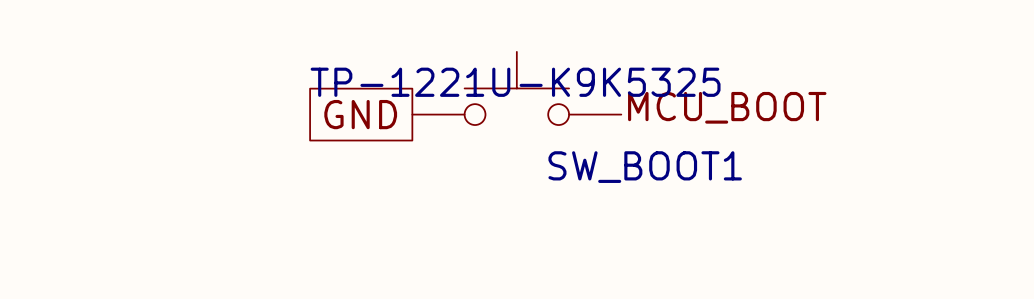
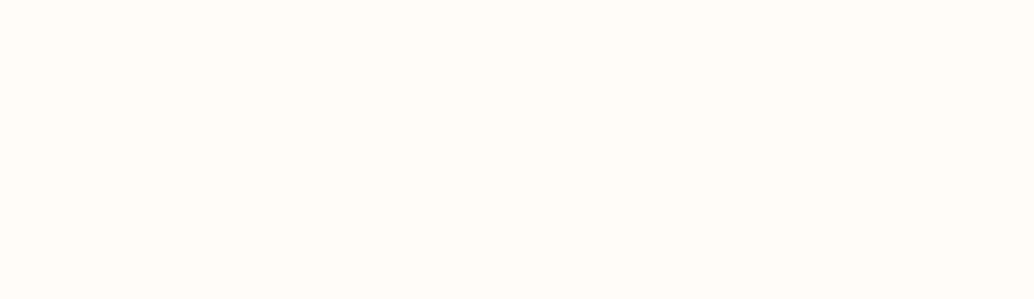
SW_BOOT1: TP-1221U-K9K5325 (516, 88) -> none
label: MCU_BOOT (727, 107) -> none
global label: GND (360, 114) -> none

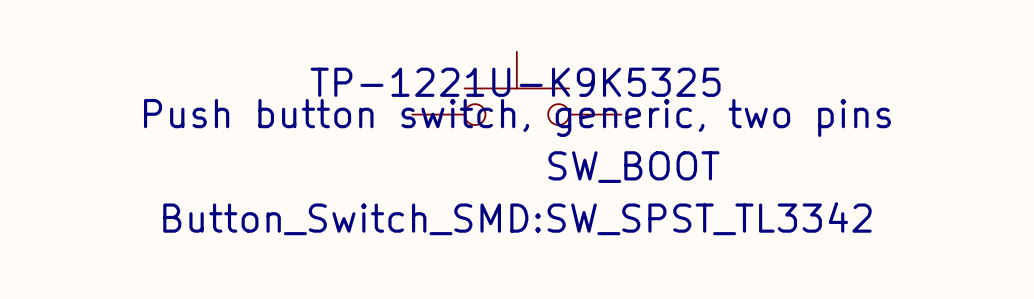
SW_BOOT: none -> TP-1221U-K9K5325 (516, 88)

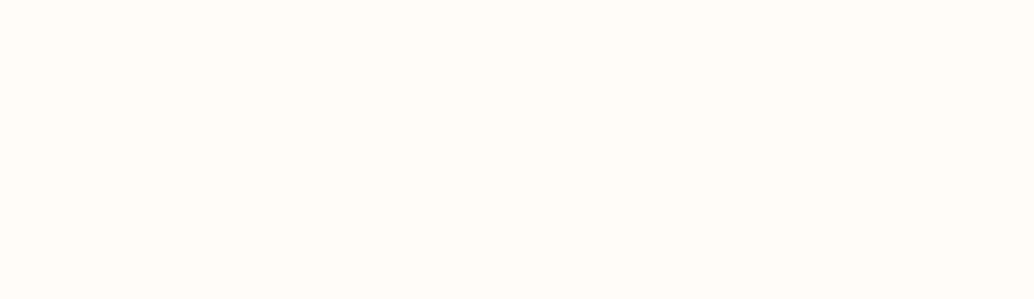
SW_BOOT: TP-1221U-K9K5325 (516, 88) -> none

